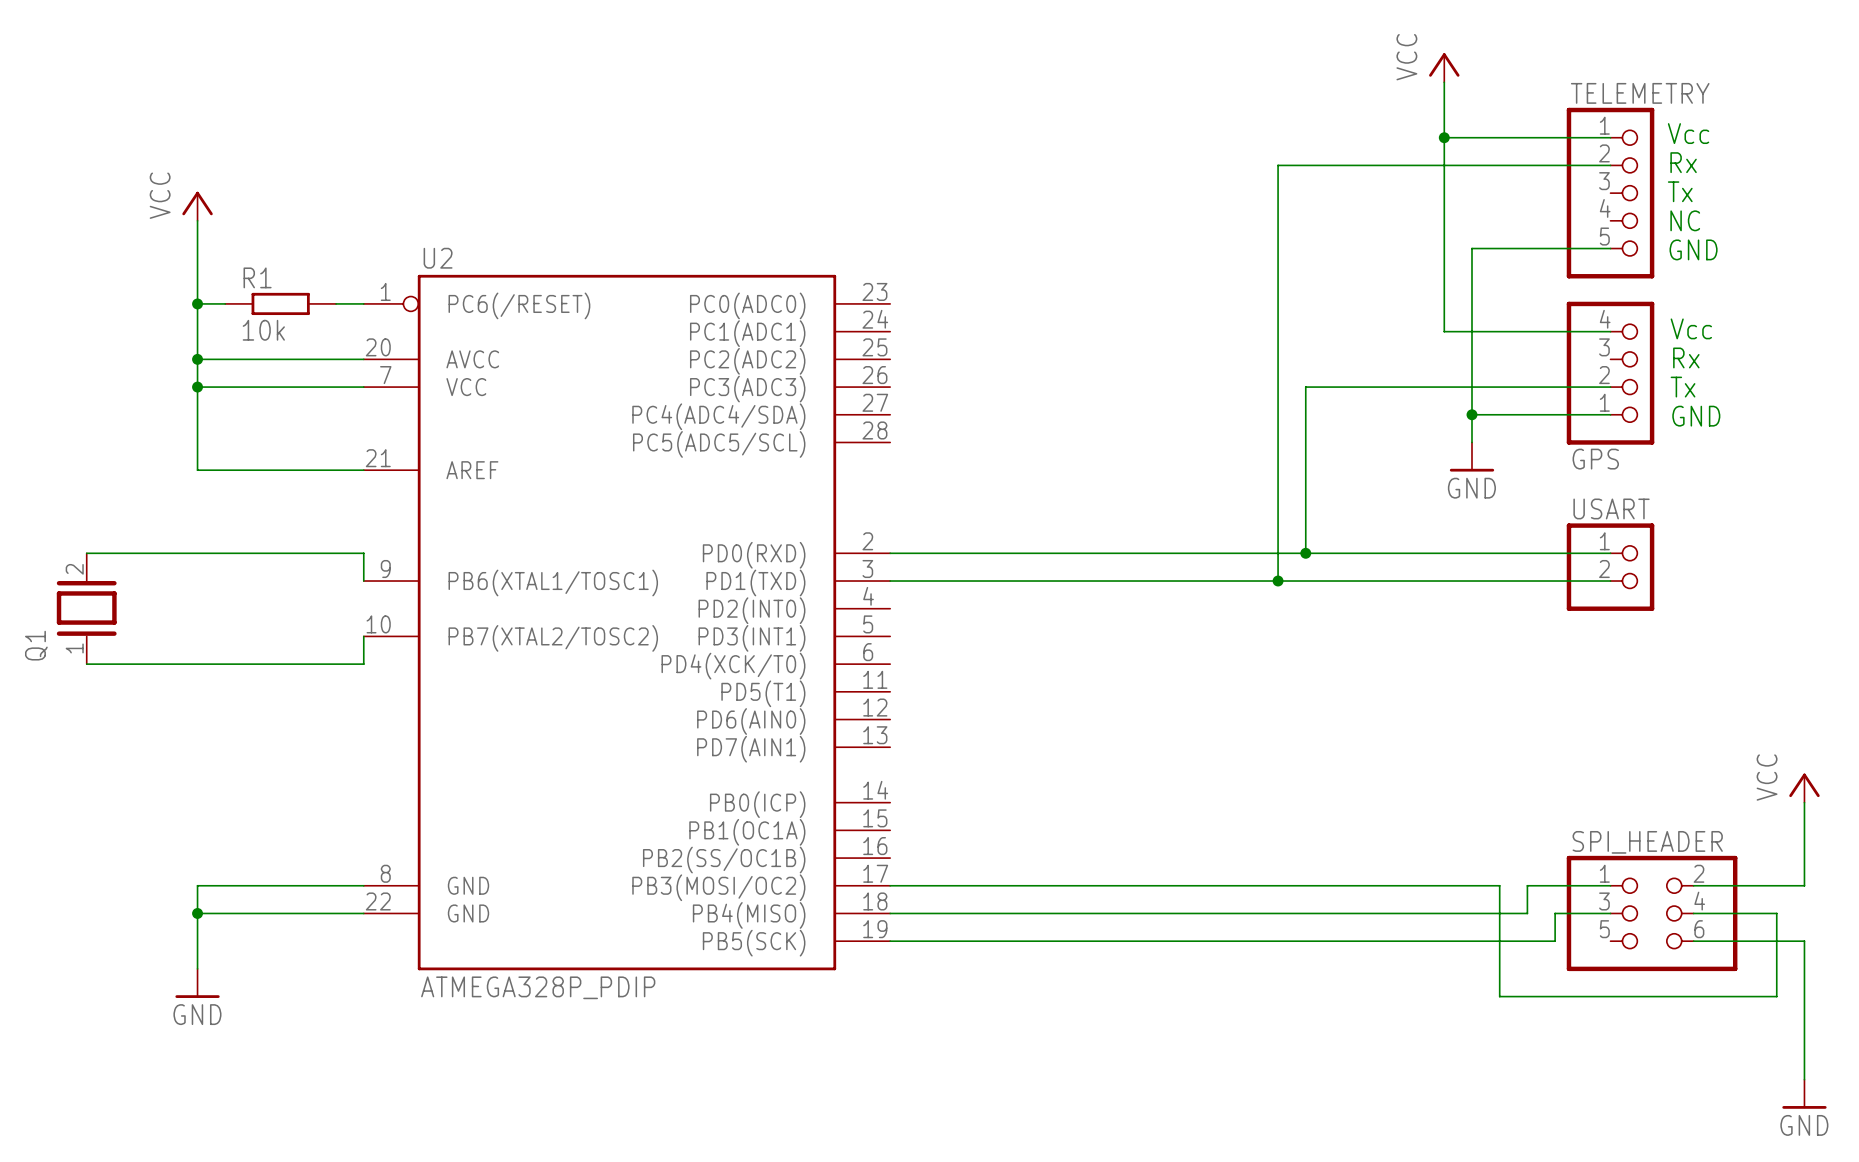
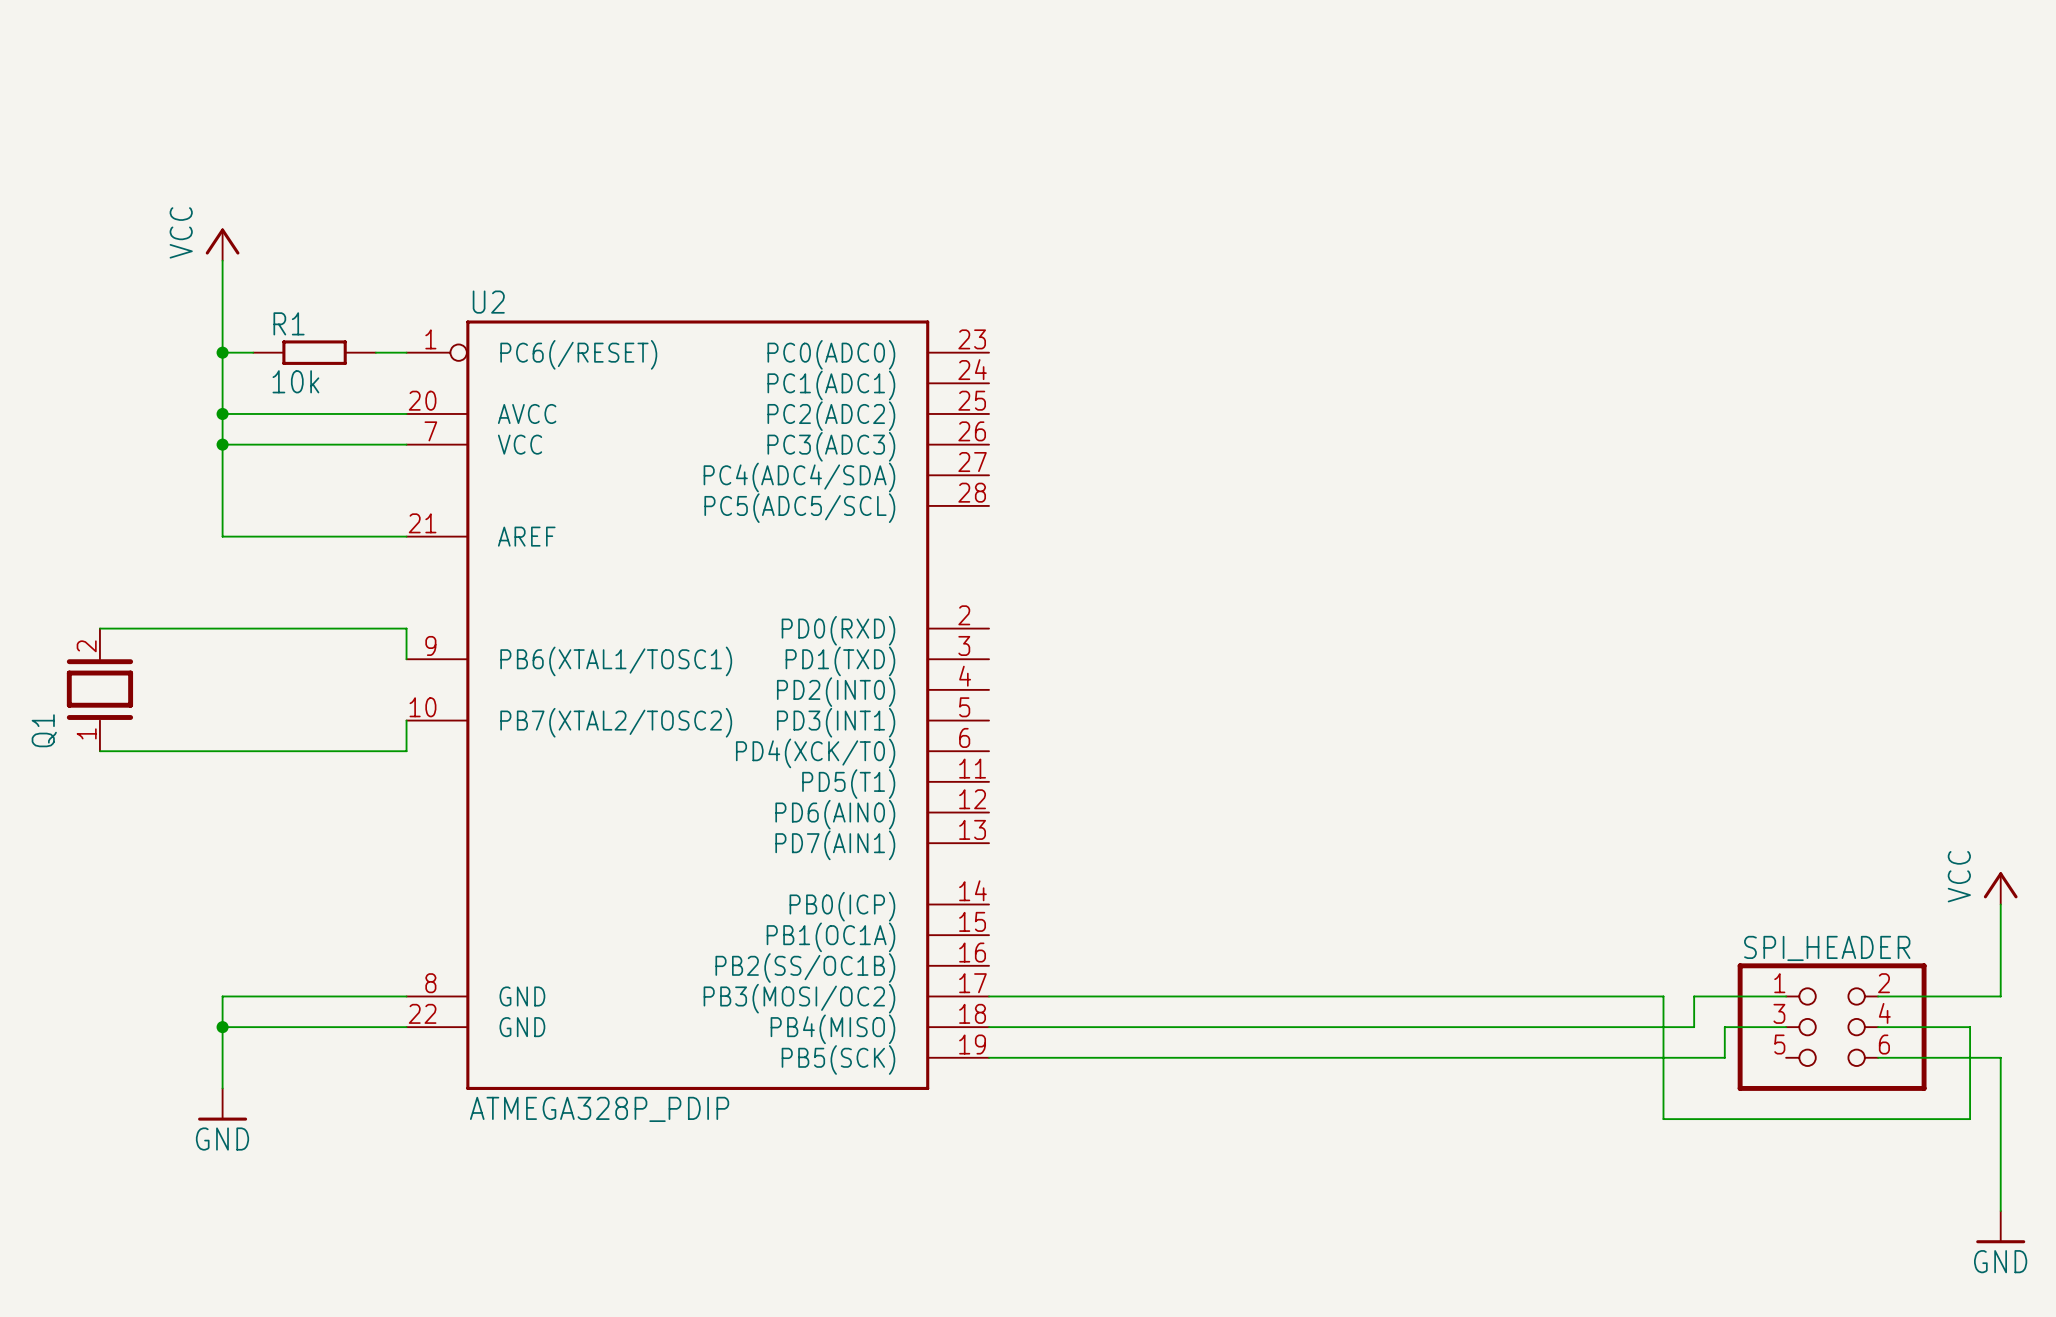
power symbol: VCC (1444, 67) -> none
wire: (1444, 82) (1444, 331) (1610, 331) -> none
text: Vcc (1688, 133) -> none
wire: (1444, 137) (1610, 137) -> none
junction: (1444, 137) -> none
text: Rx (1683, 162) -> none
wire: (1610, 165) (1278, 165) (1278, 581) -> none
text: Tx (1680, 191) -> none
TELEMETRY: (1610, 193) -> none
text: NC (1685, 220) -> none
wire: (1610, 248) (1471, 248) (1471, 442) -> none
text: GND (1693, 249) -> none
text: Vcc (1691, 328) -> none
text: Rx (1686, 357) -> none
GPS: (1610, 373) -> none
wire: (1610, 387) (1305, 387) (1305, 553) -> none
text: Tx (1683, 387) -> none
wire: (1471, 414) (1610, 414) -> none
junction: (1471, 414) -> none
text: GND (1696, 416) -> none
power symbol: GND (1471, 457) -> none
wire: (890, 553) (1610, 553) -> none
junction: (1305, 553) -> none
USART: (1610, 567) -> none
wire: (890, 581) (1610, 581) -> none
junction: (1278, 581) -> none

